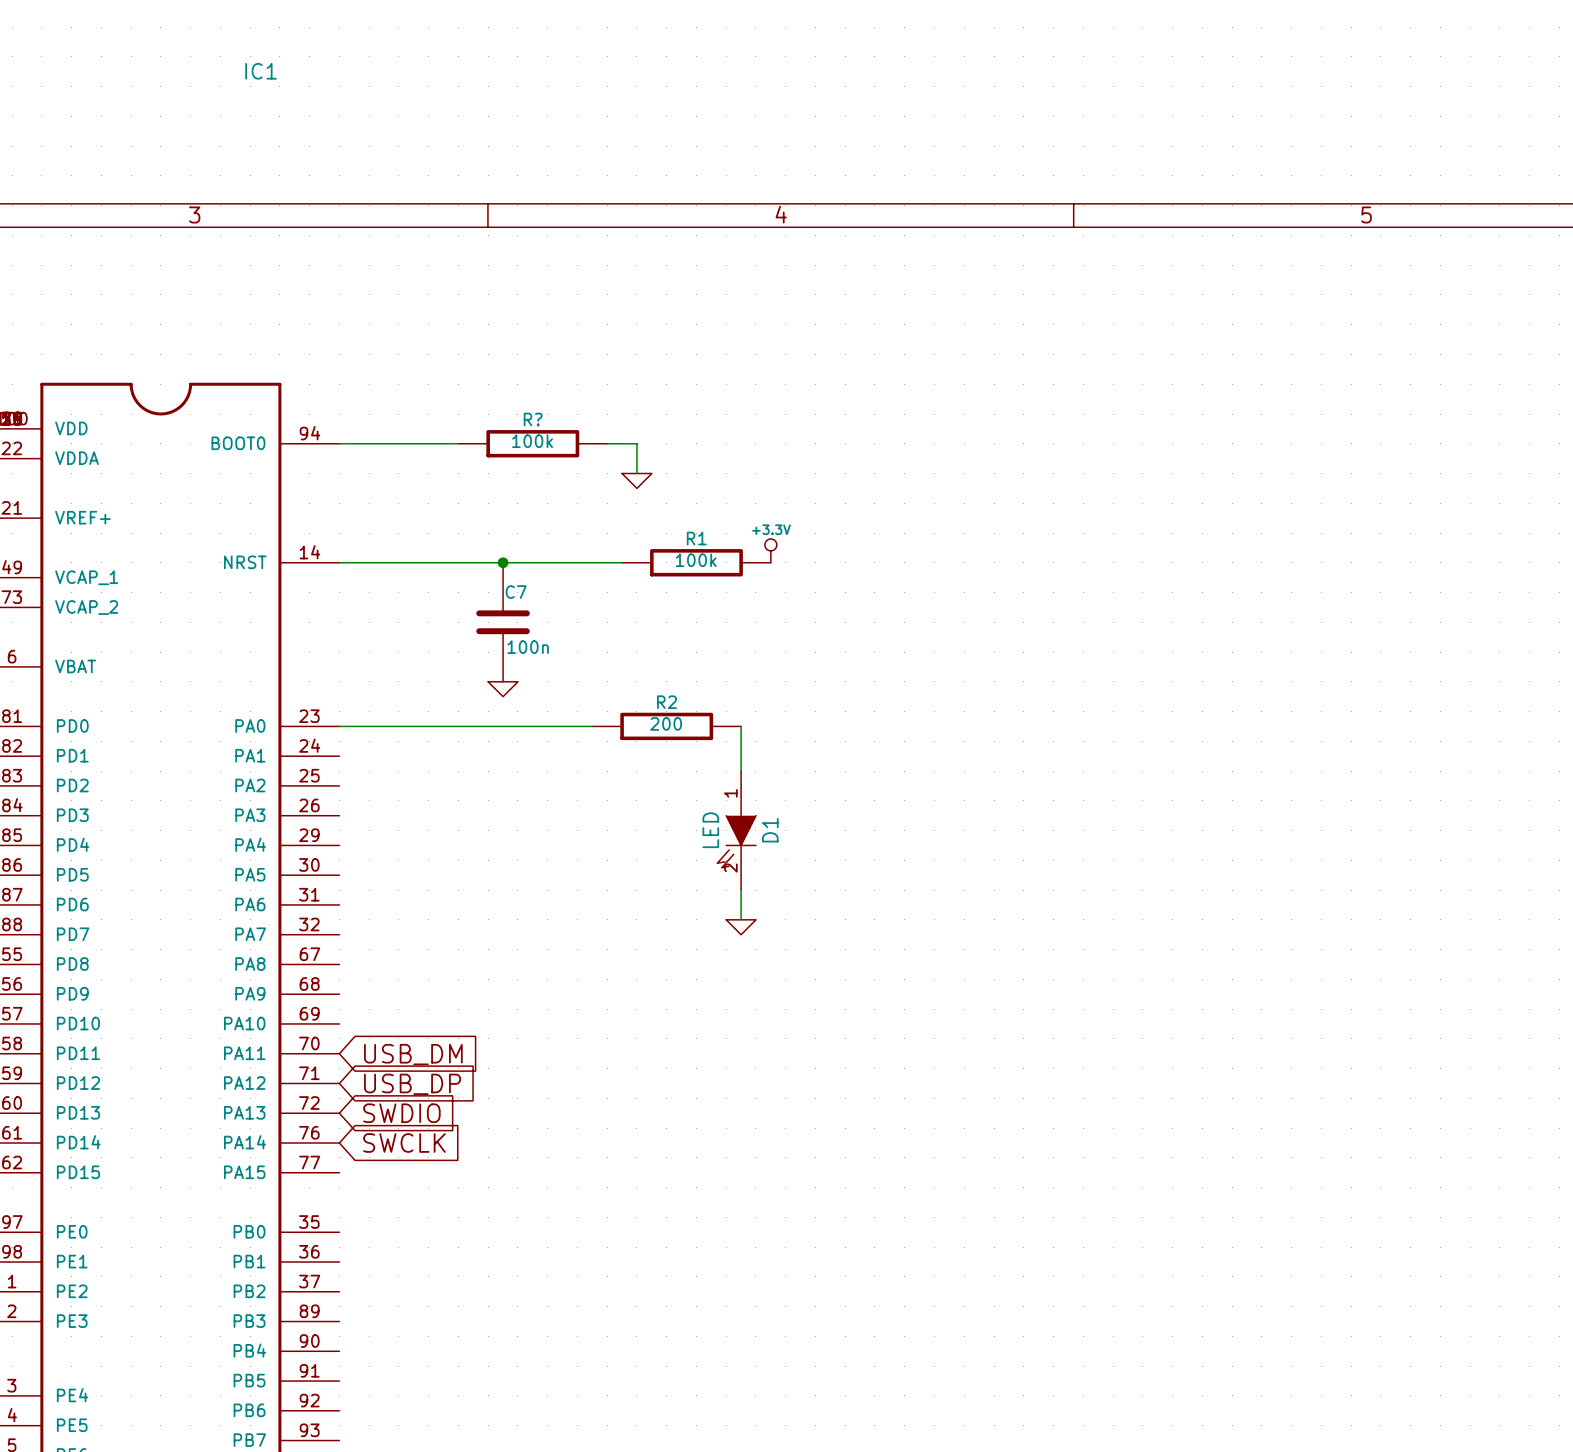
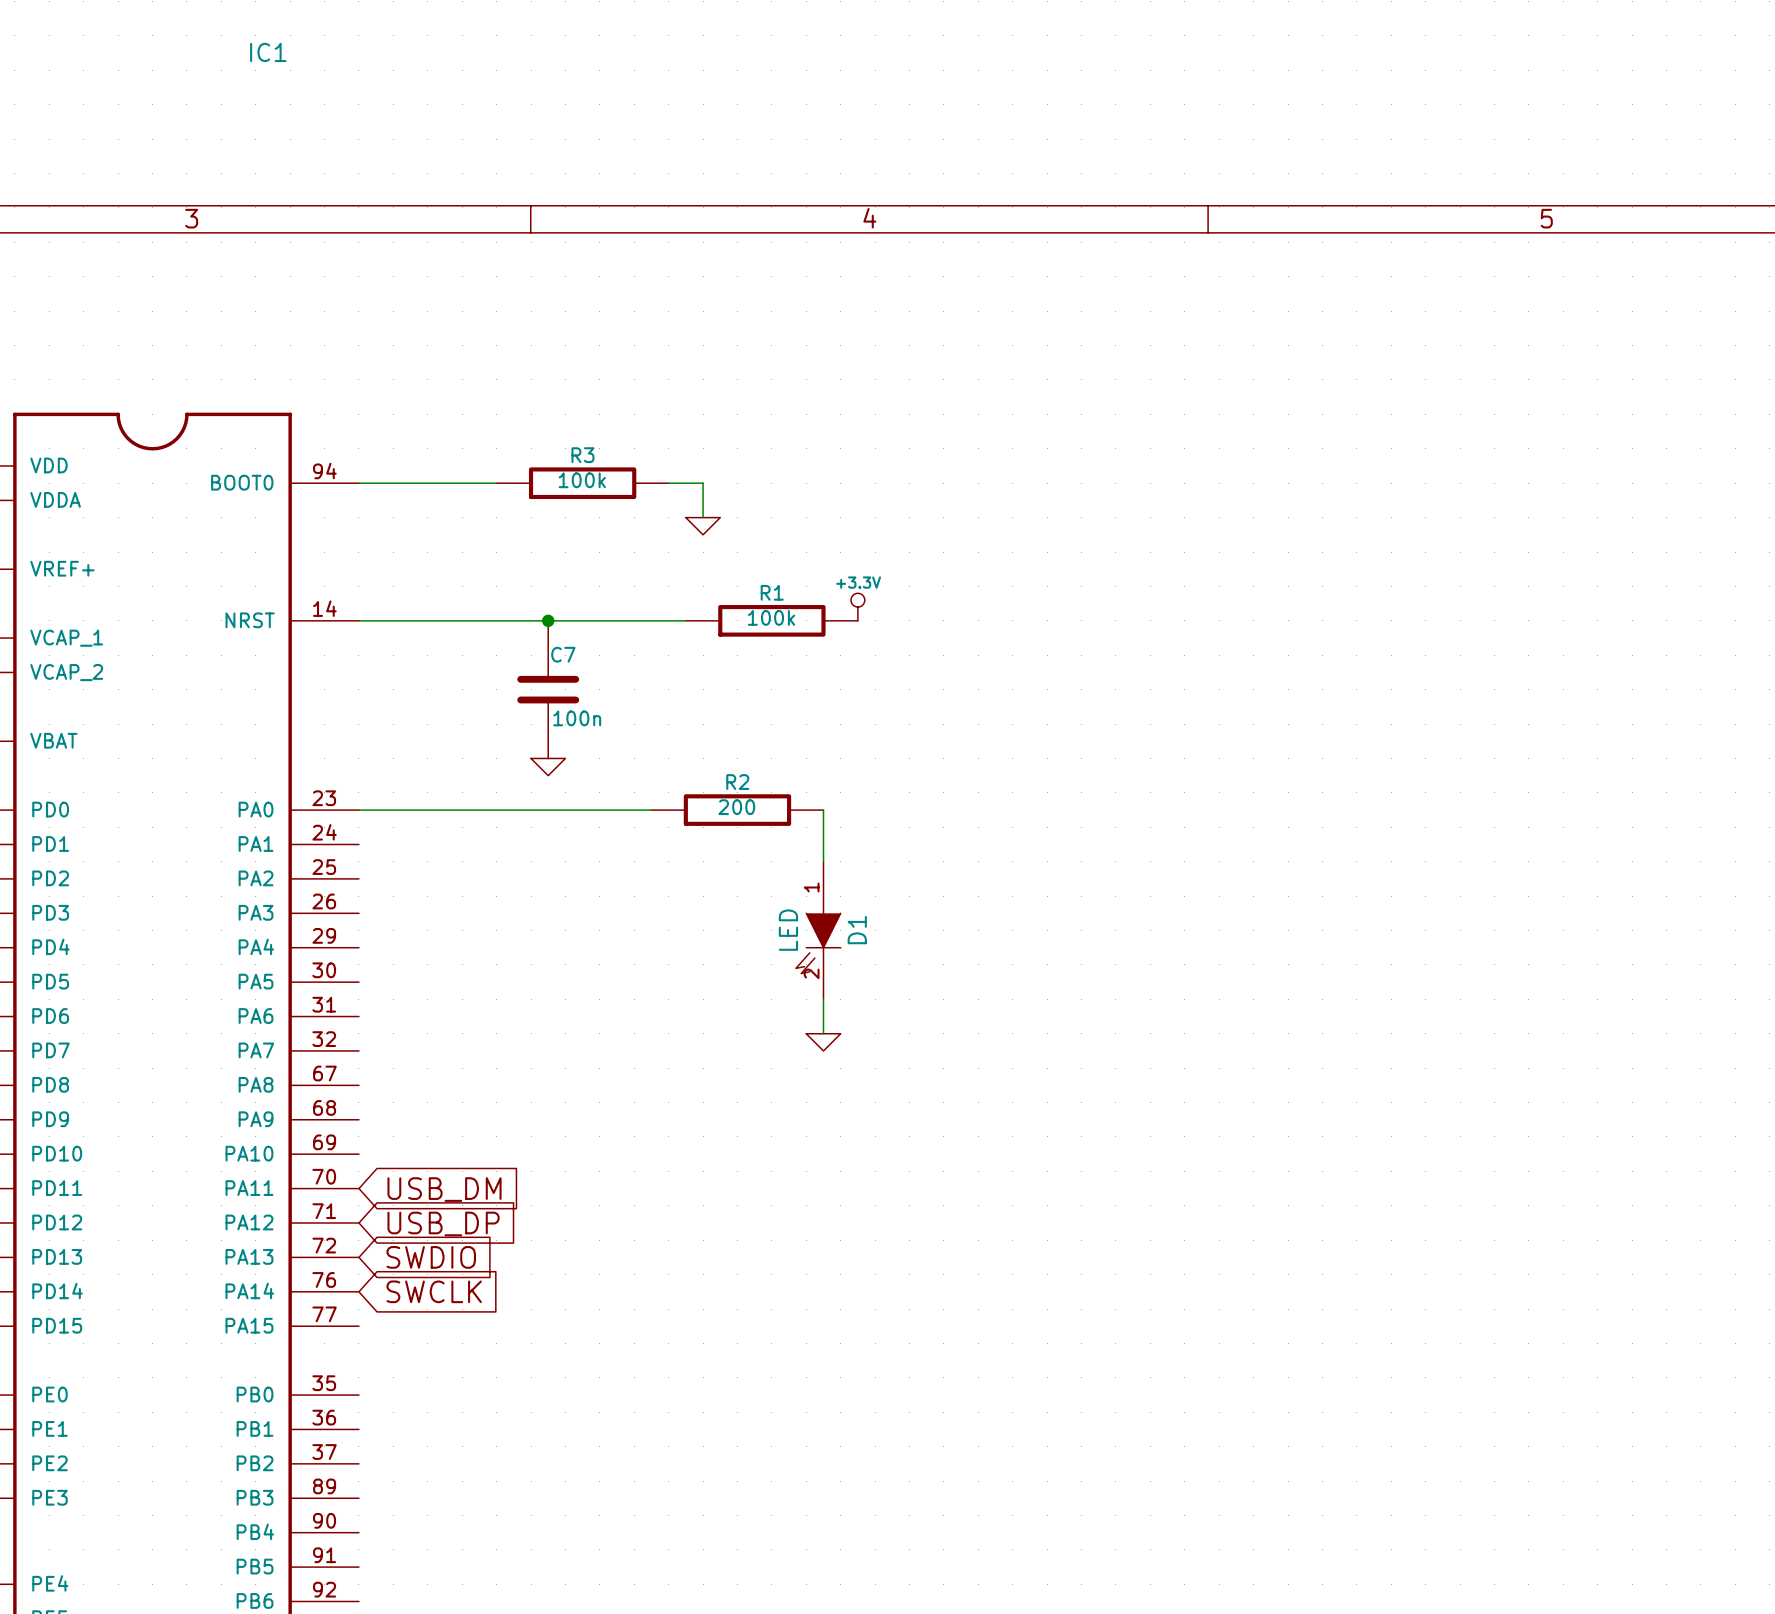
R? name: R? (533, 419) -> R3 (582, 455)

